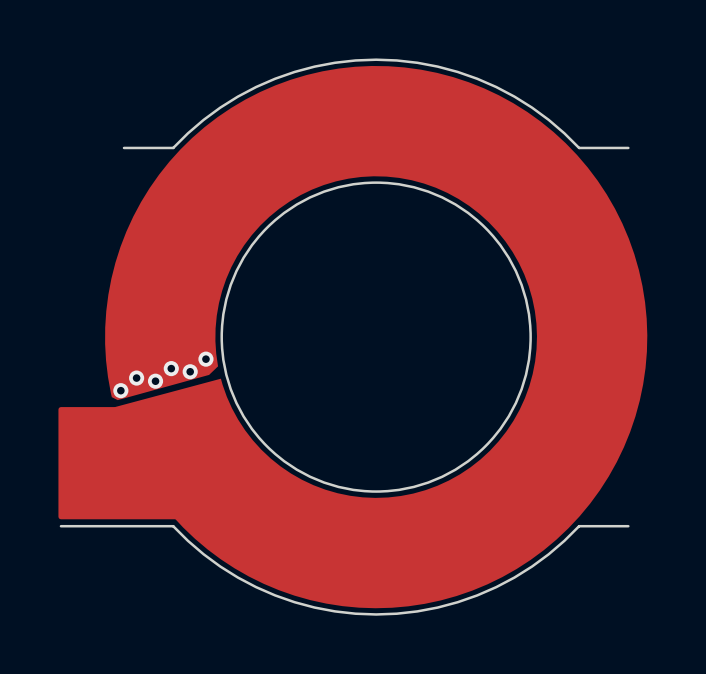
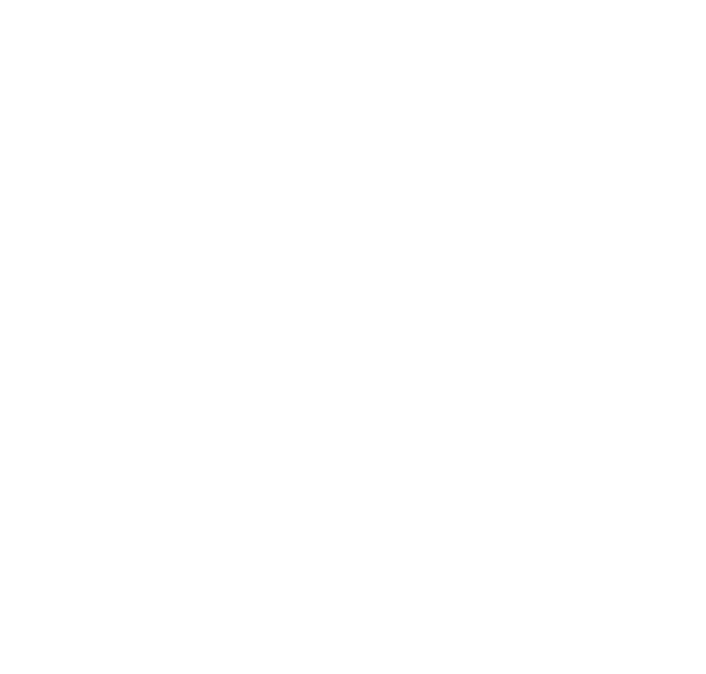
drawing: [58, 65, 648, 609] -> none
board edge: (124, 147) (173, 147) (187, 133) (220, 107) (237, 96) (275, 78) (294, 71) (334, 62) (376, 59) (396, 60) (437, 66) (477, 78) (514, 96) (532, 107) (564, 133) (579, 147) (628, 147) -> none
round board edge: [220, 181, 532, 493] -> none
via: (205, 359) -> none
via: (171, 368) -> none
via: (190, 371) -> none
via: (136, 378) -> none
via: (155, 381) -> none
via: (120, 390) -> none
board edge: (60, 526) (173, 526) (203, 554) (220, 566) (237, 577) (275, 595) (314, 607) (334, 611) (376, 614) (417, 611) (437, 607) (477, 595) (514, 577) (532, 566) (548, 554) (579, 526) (628, 526) -> none

